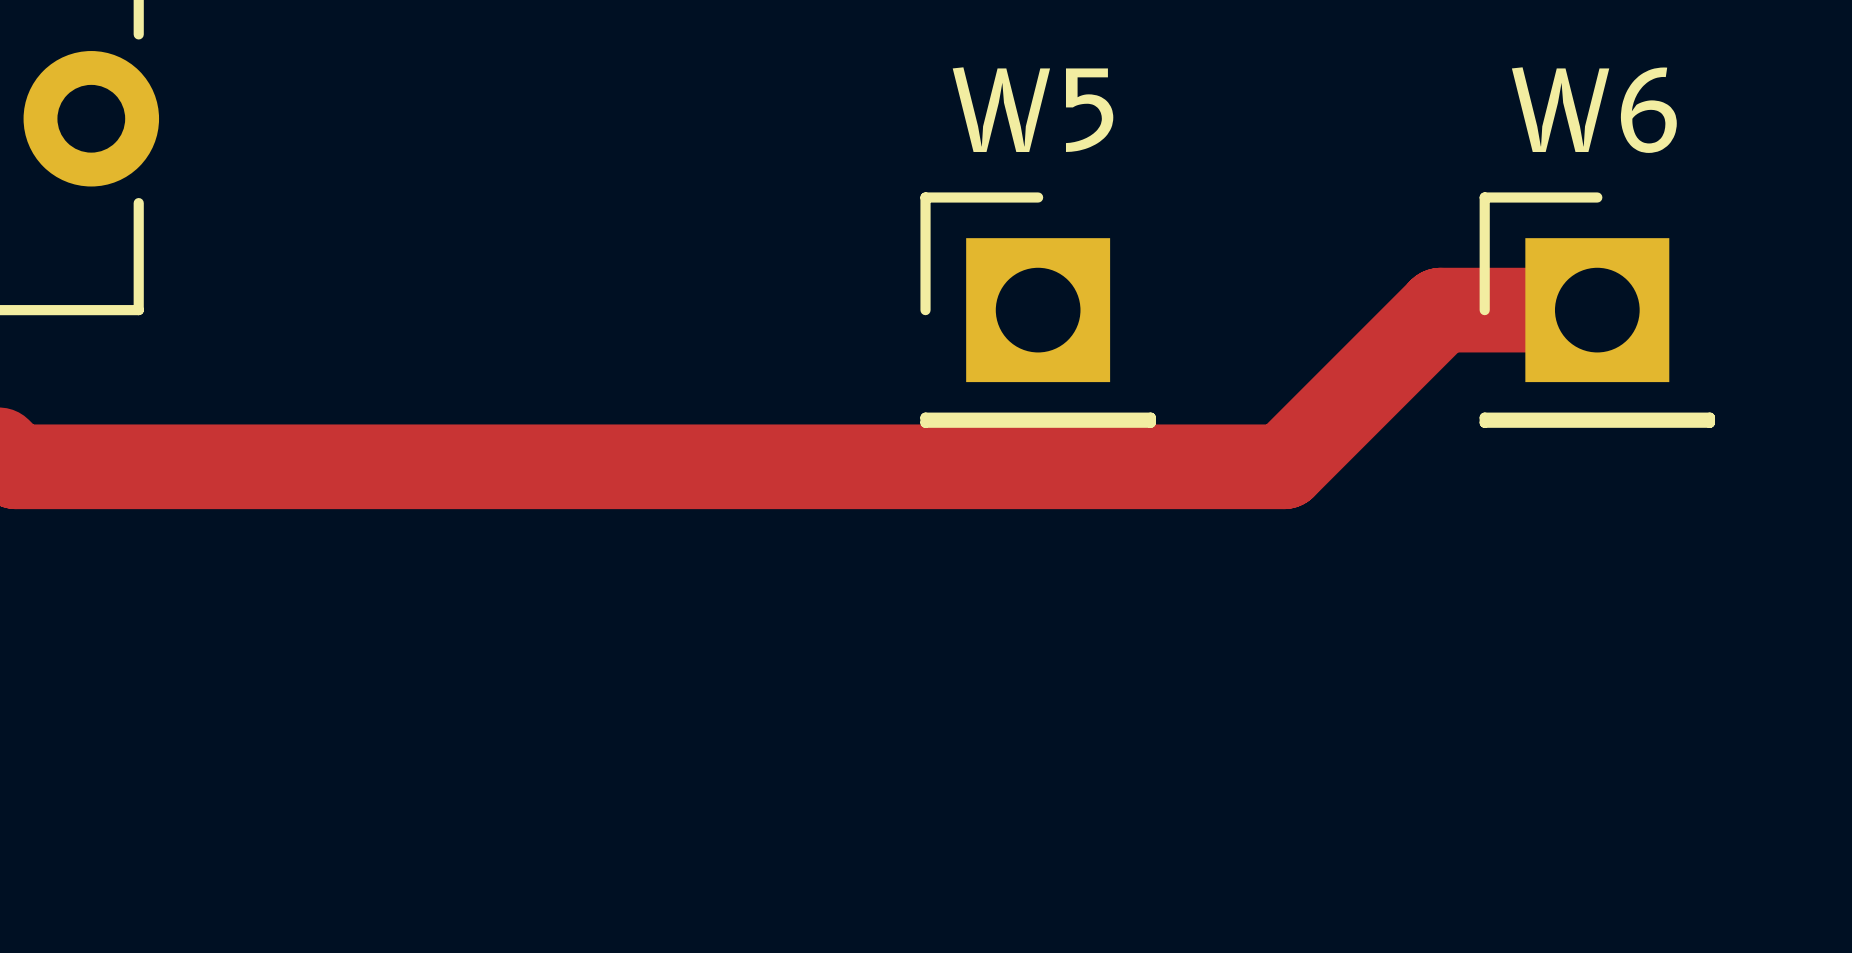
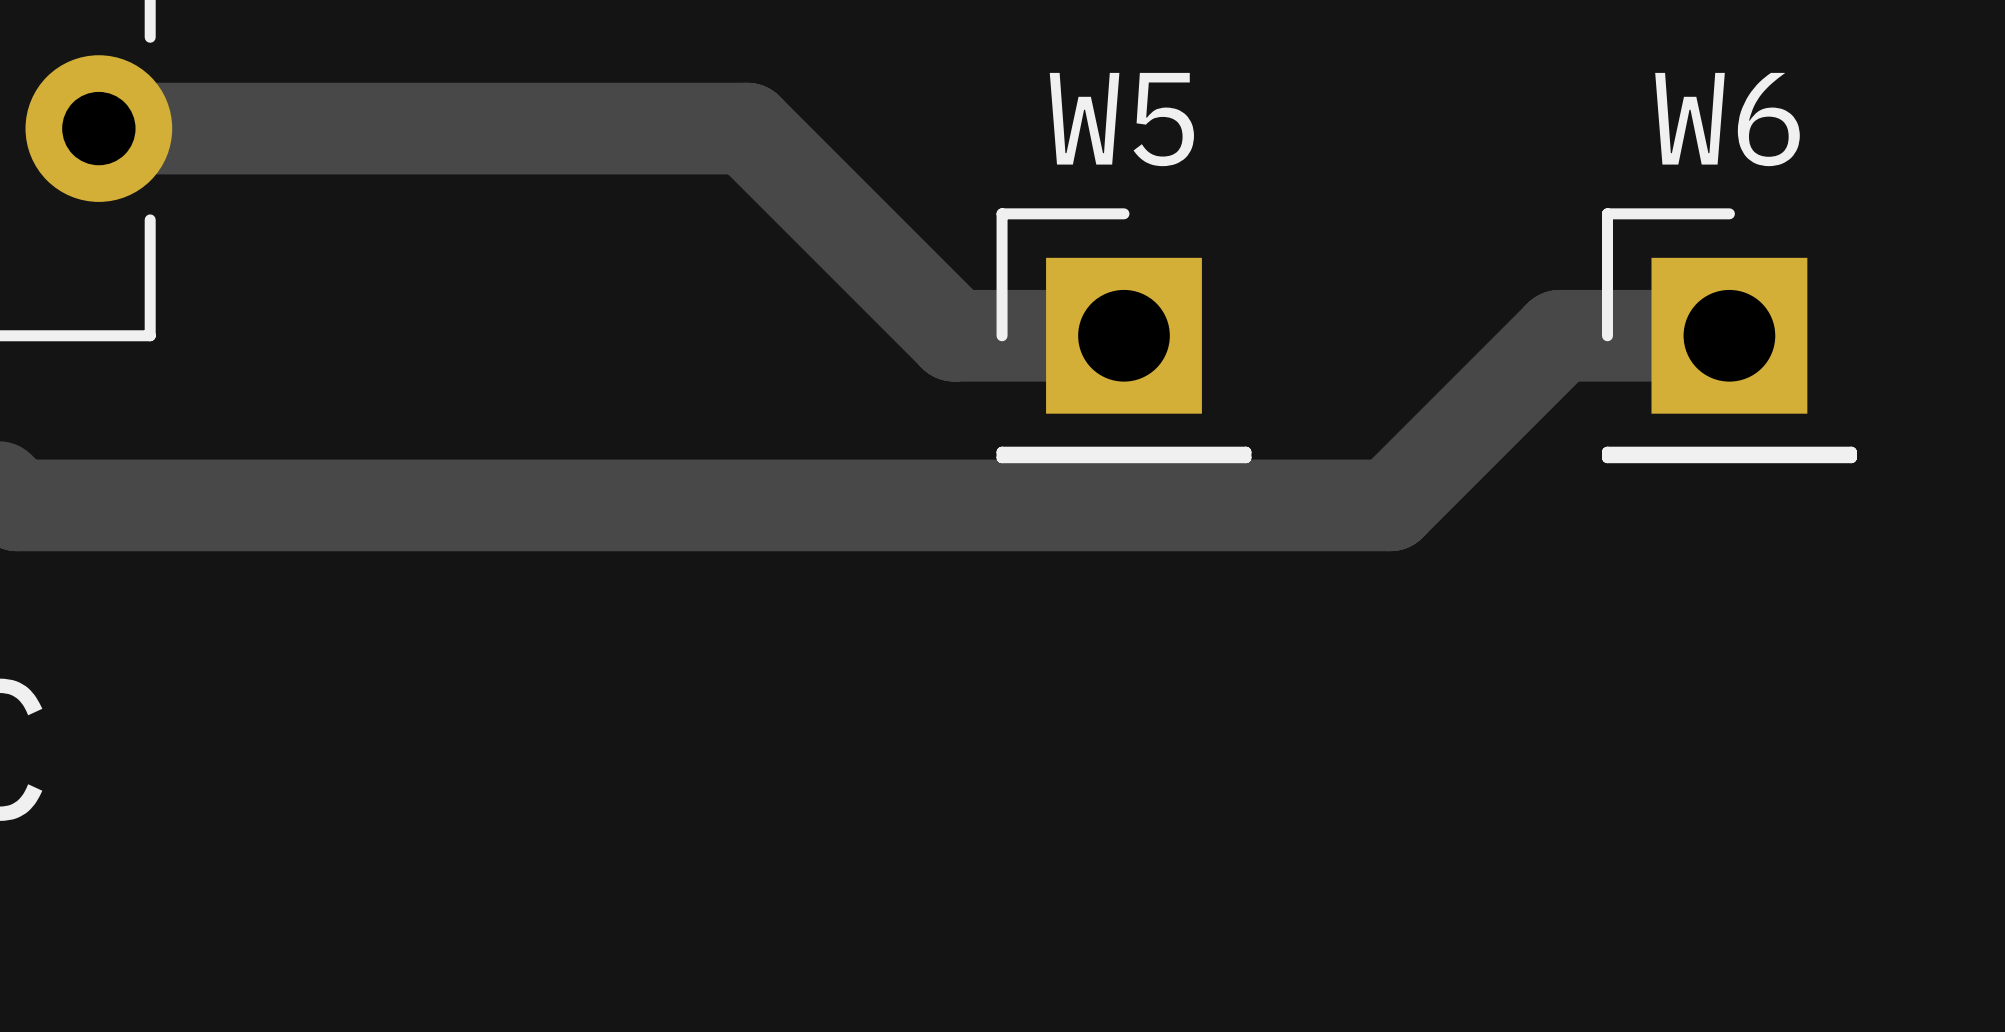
track: none -> (98, 128) (747, 128) (954, 335) (1123, 335)

